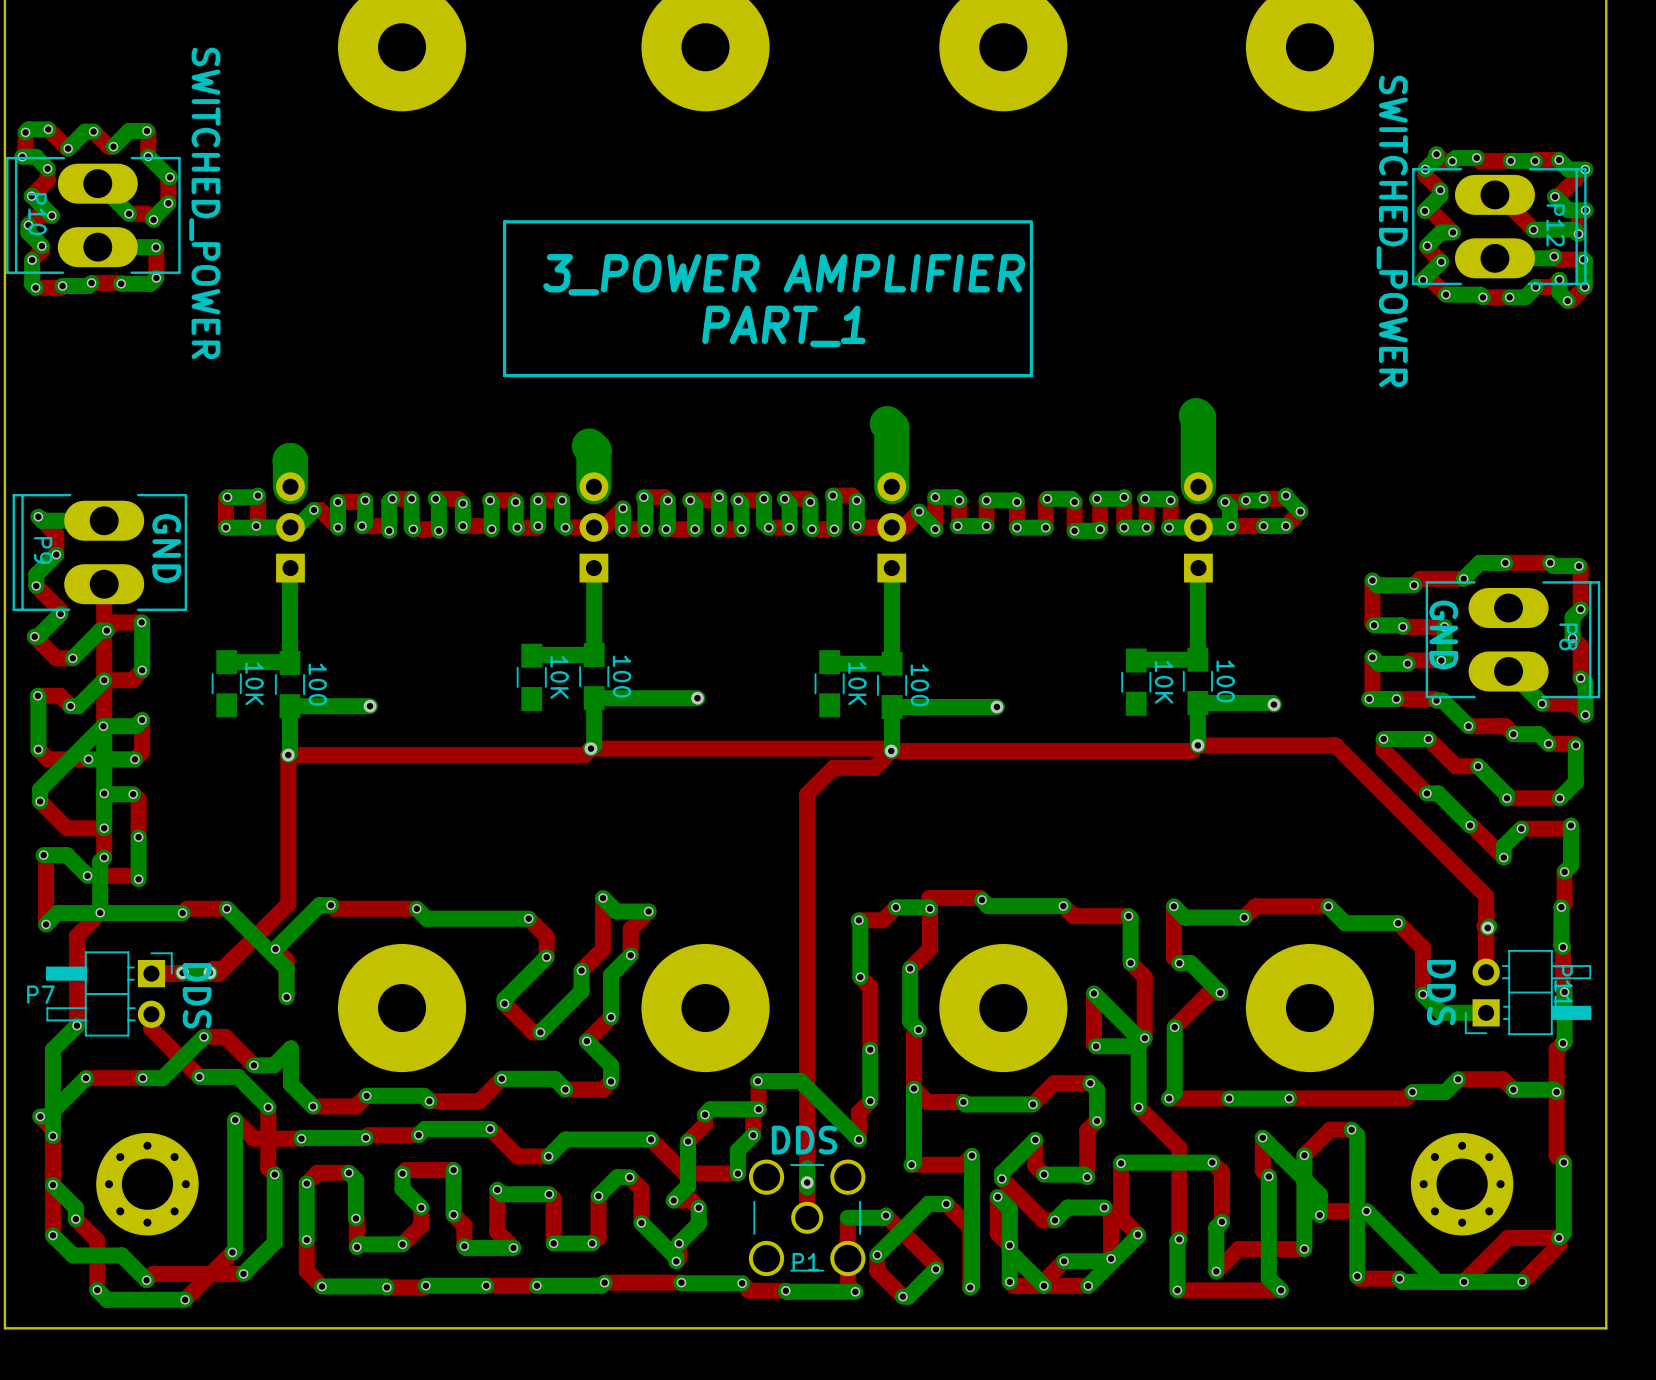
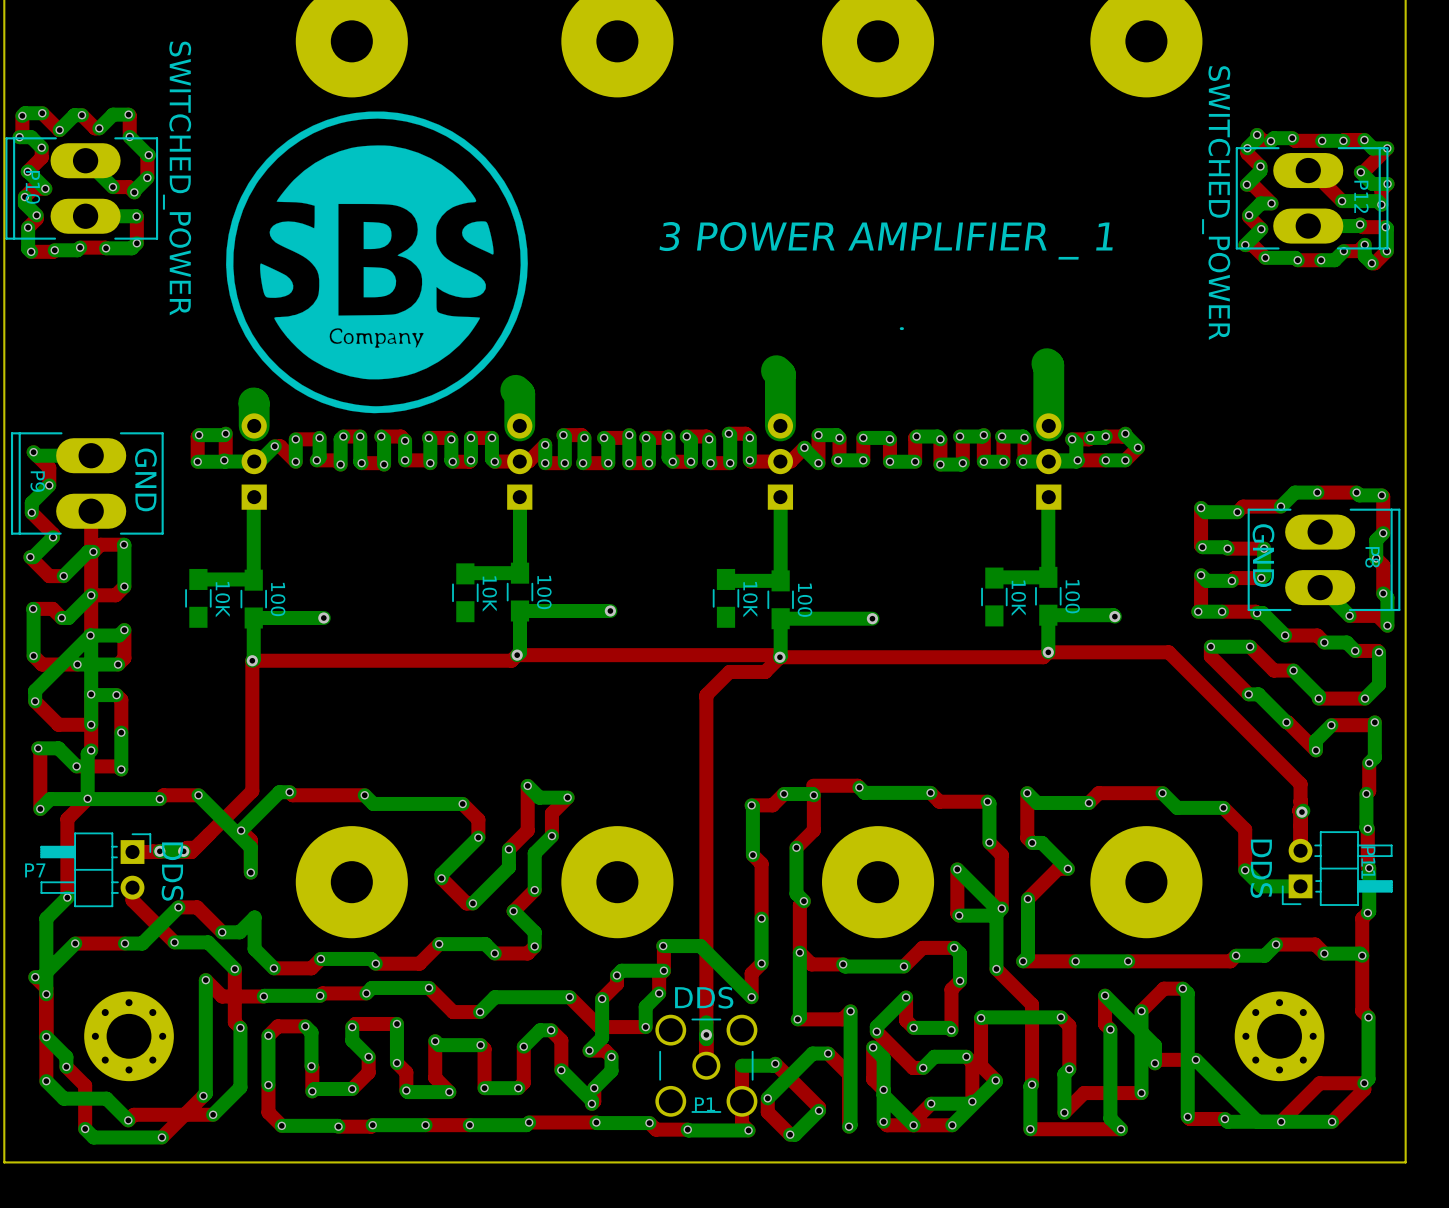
drawing: none -> [226, 111, 528, 414]
line: (1031, 221) (504, 221) (504, 375) (1029, 375) -> none
line: (1031, 223) (1031, 375) -> none
text: 3_POWER AMPLIFIER (784, 274) -> 3 POWER AMPLIFIER _ 1 (886, 240)
text: PART_1 (783, 326) -> none

